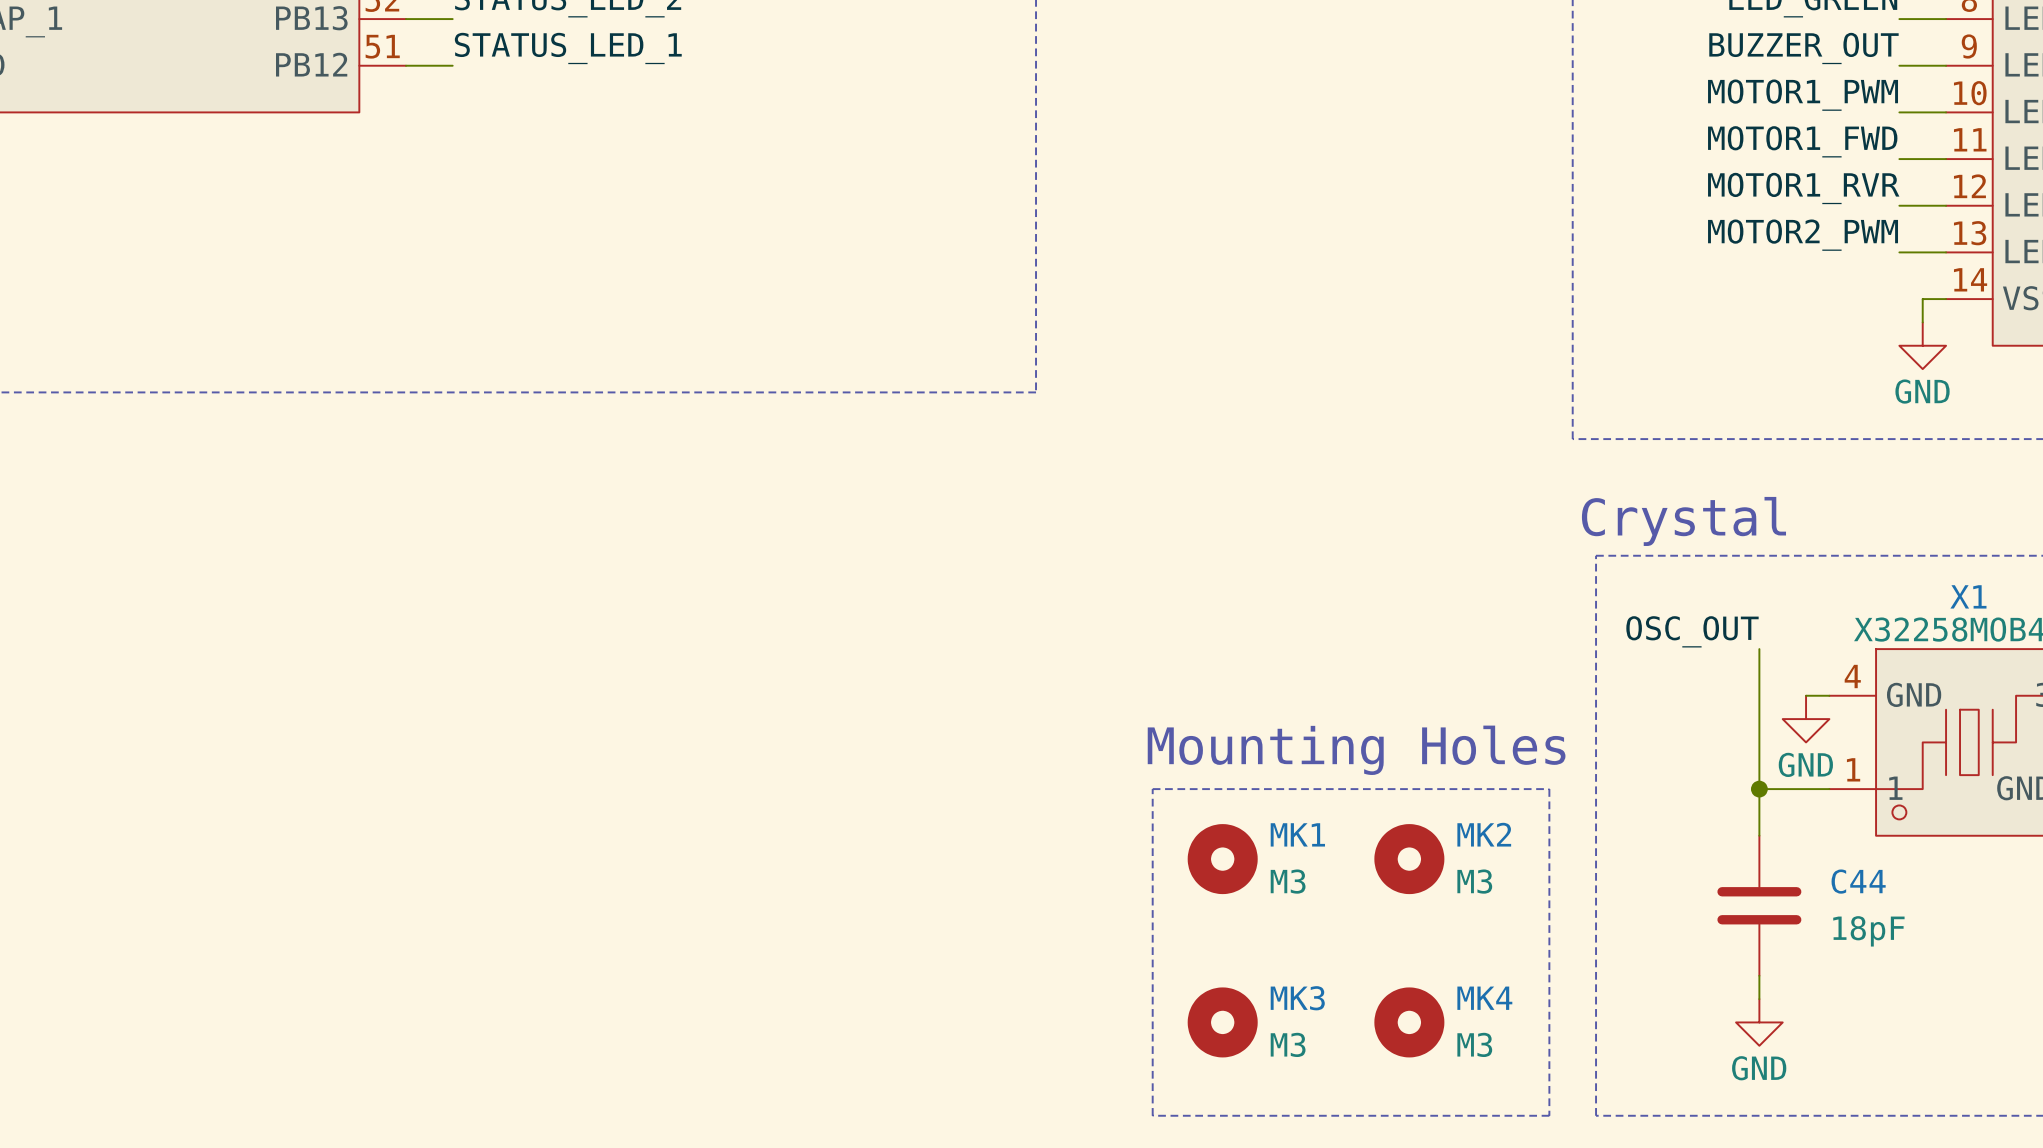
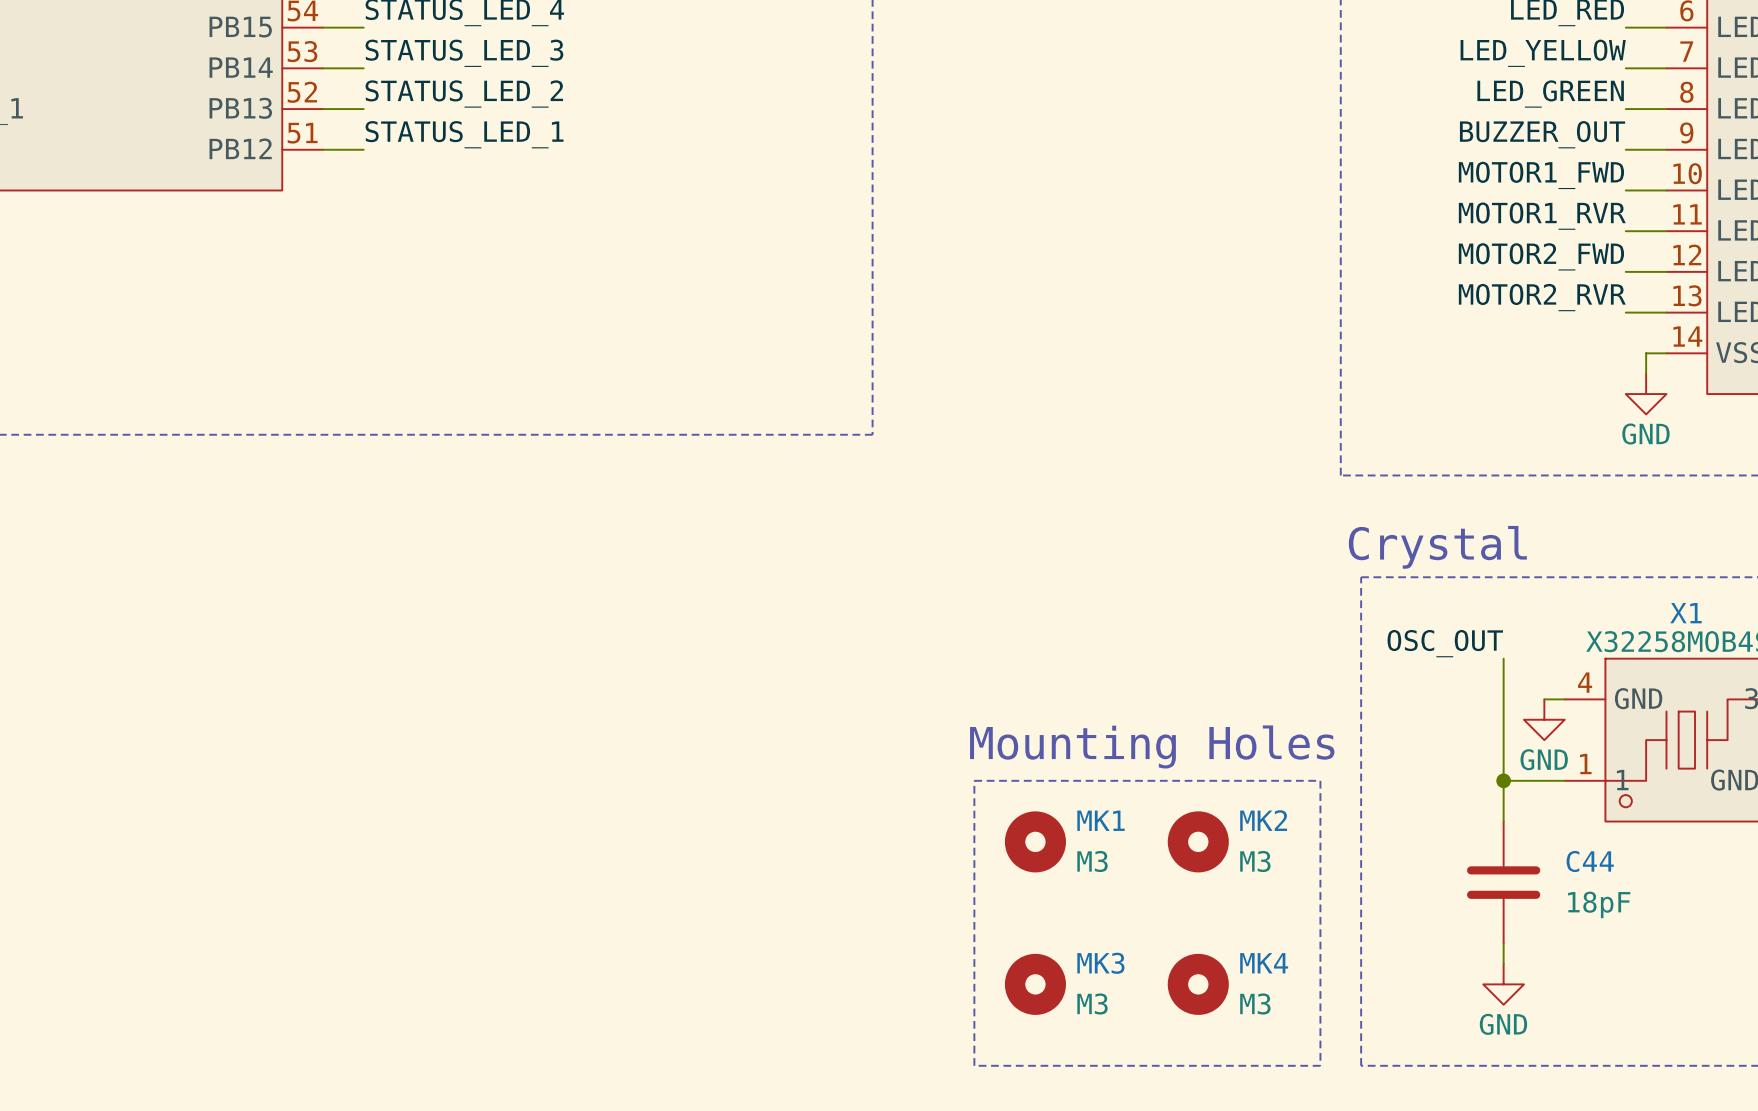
label: MOTOR1_PWM (1803, 95) -> MOTOR1_FWD (1541, 175)
label: MOTOR1_FWD (1802, 141) -> MOTOR1_RVR (1542, 216)
label: MOTOR1_RVR (1803, 188) -> MOTOR2_FWD (1541, 256)
label: MOTOR2_PWM (1803, 235) -> MOTOR2_RVR (1542, 297)

